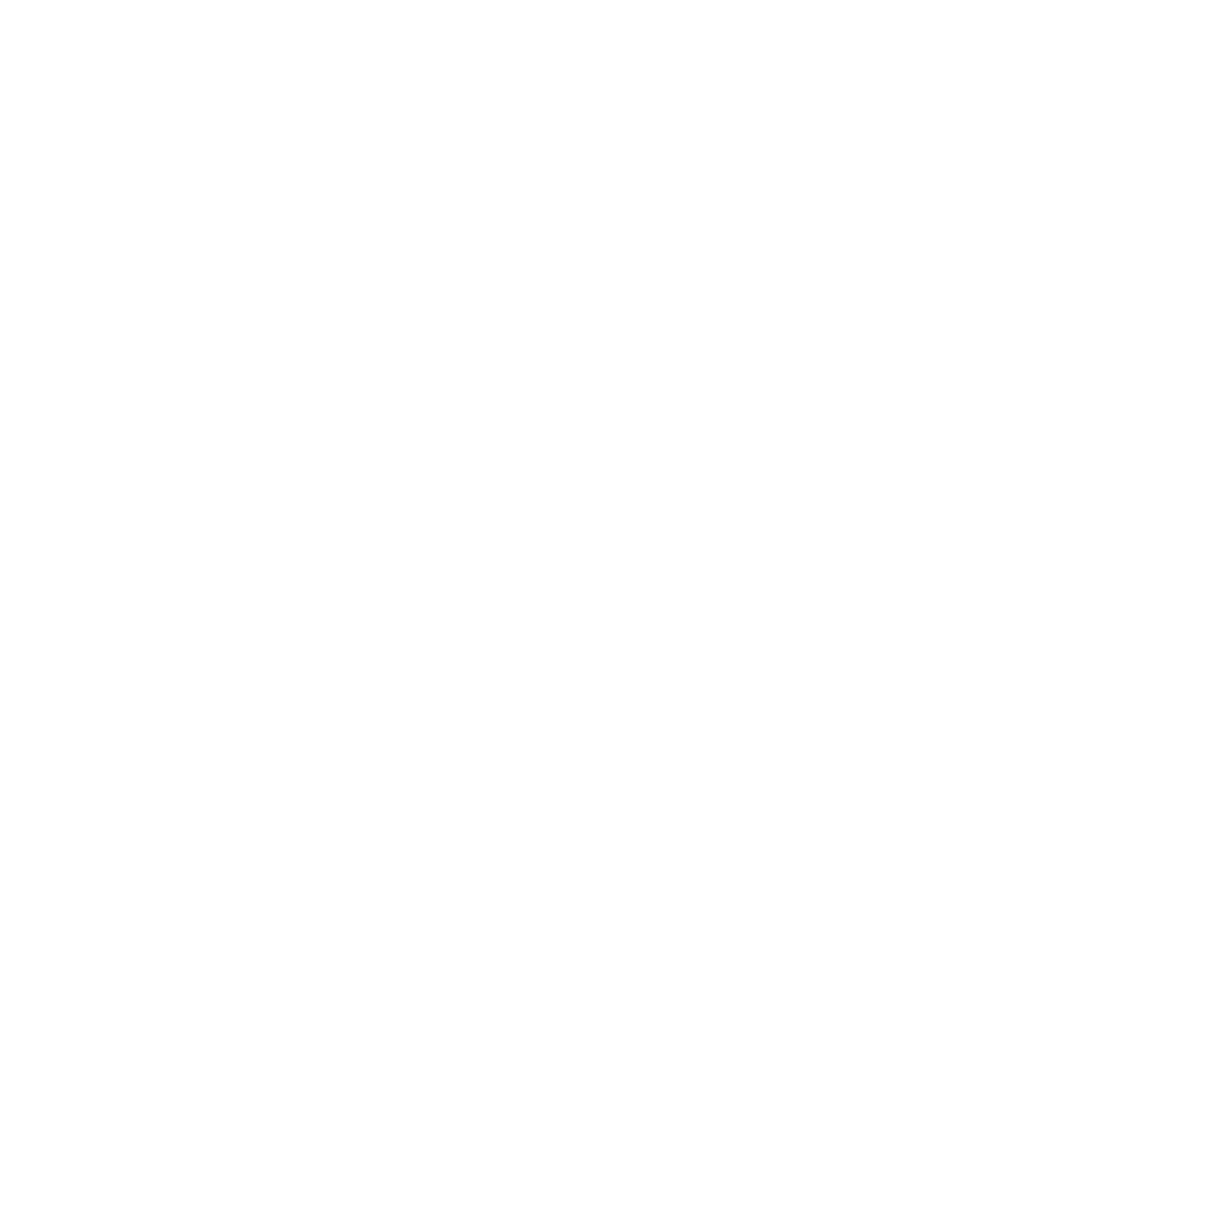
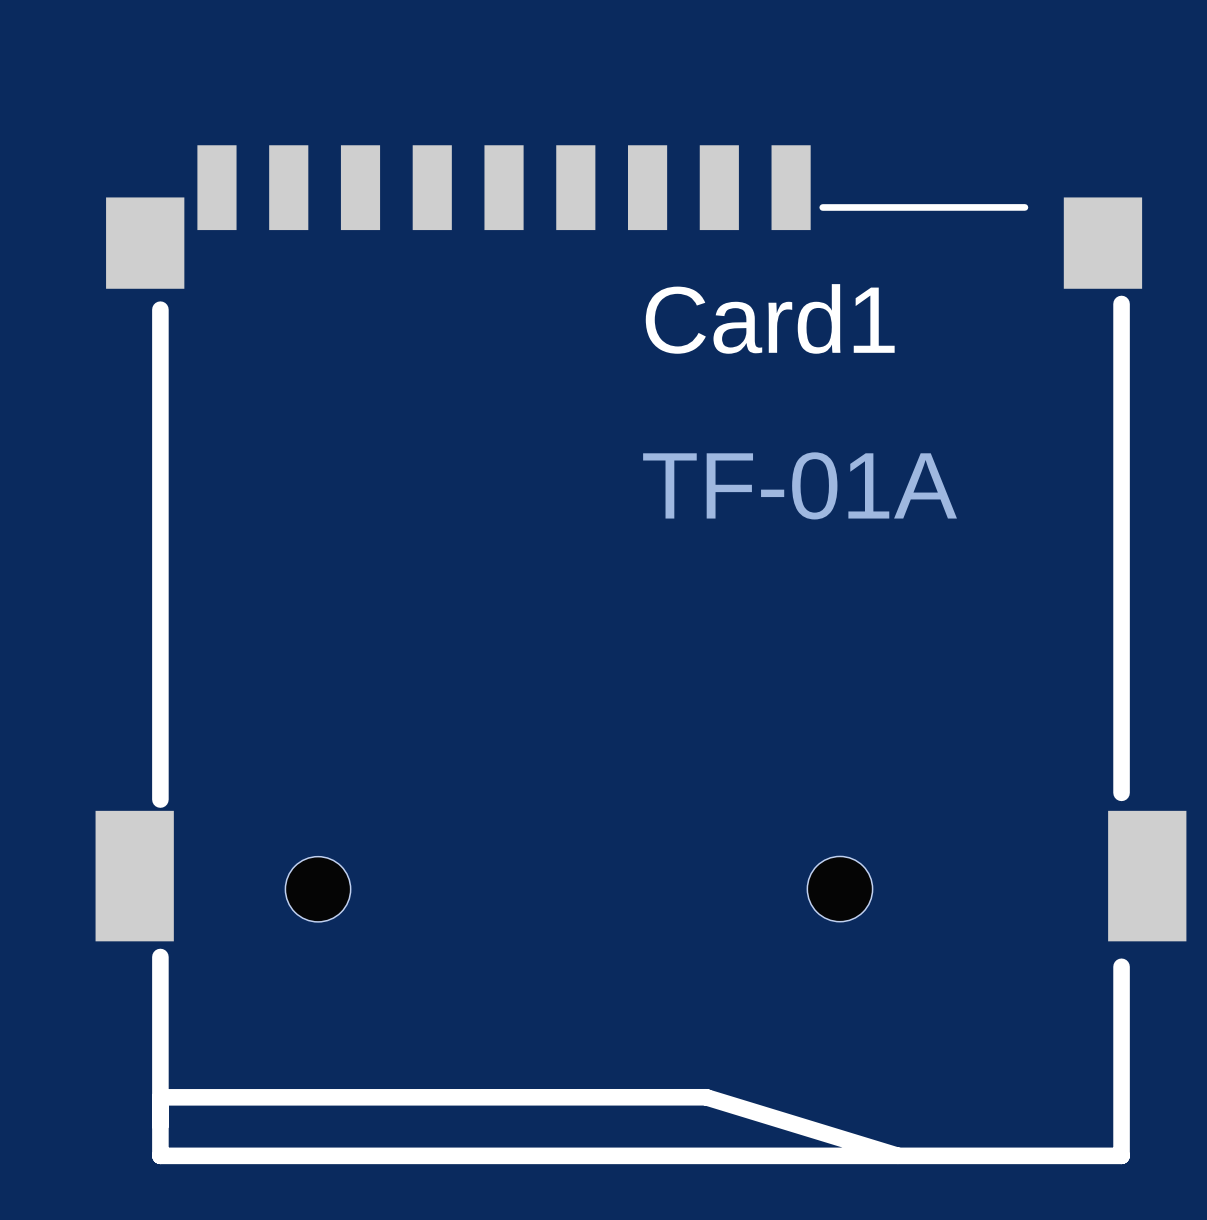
Card1: none -> TF-01A (640, 654)

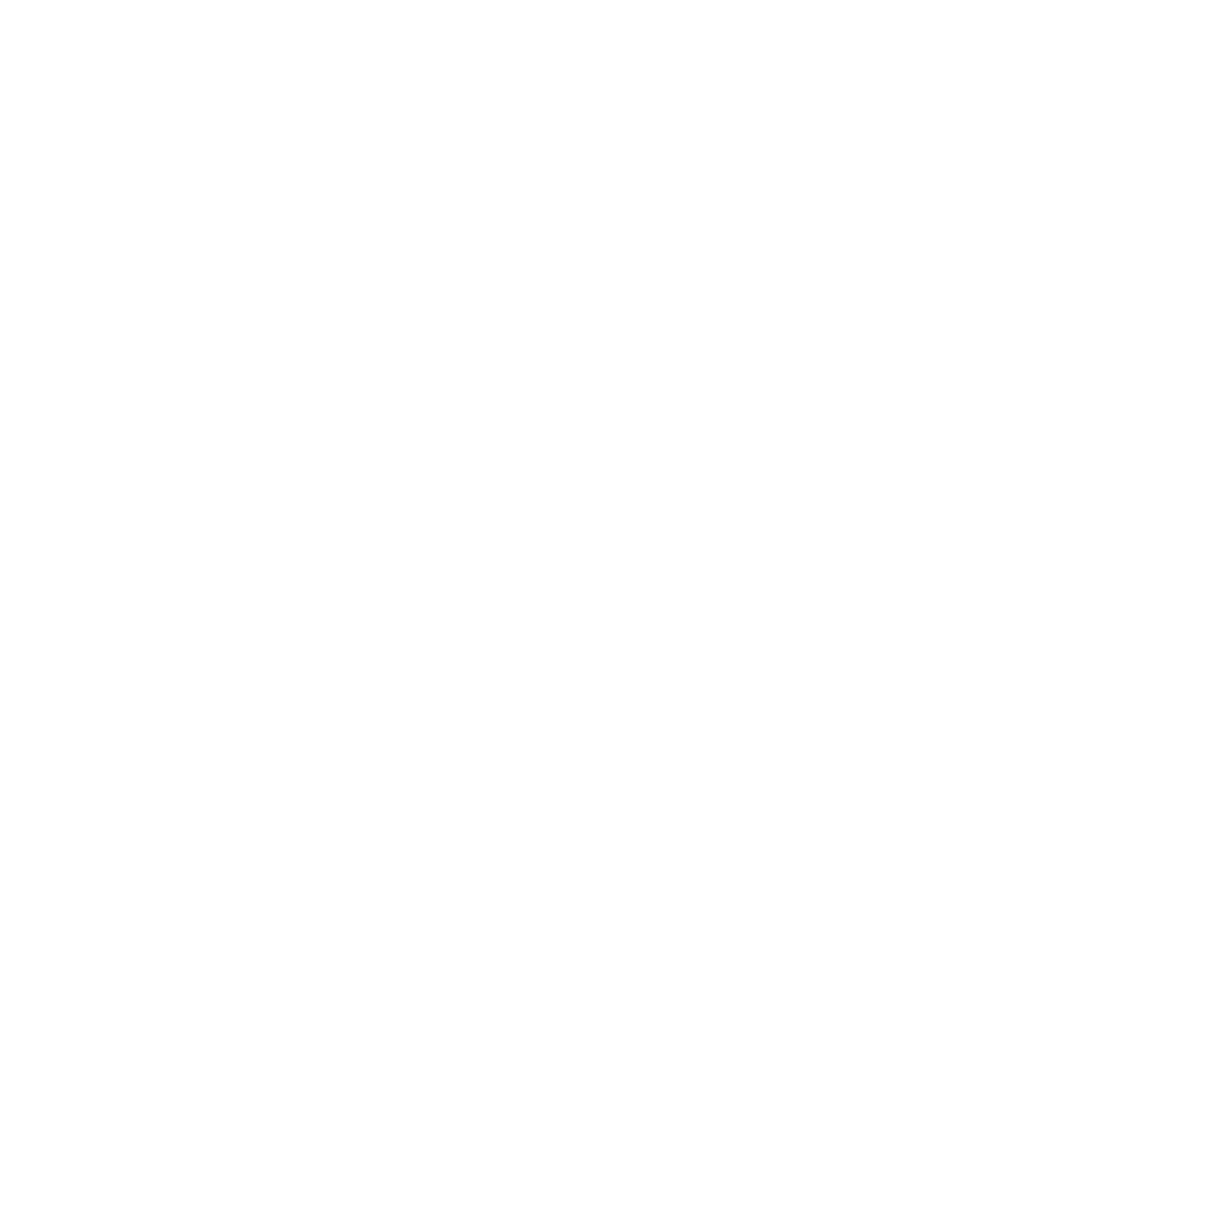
Card1: TF-01A (640, 654) -> none

